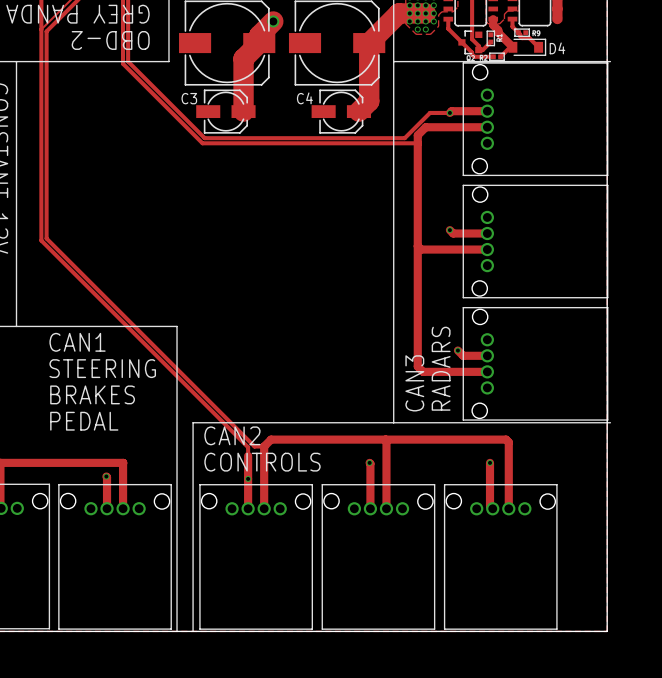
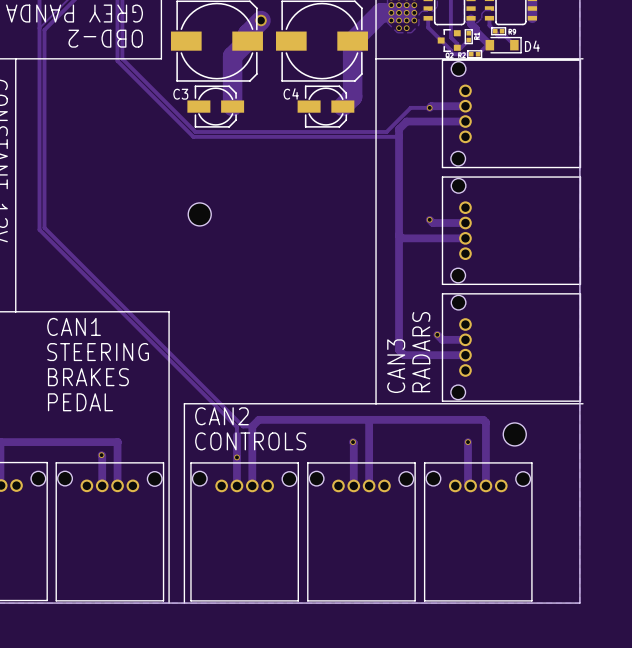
hole: none -> (199, 214)
hole: none -> (514, 434)

